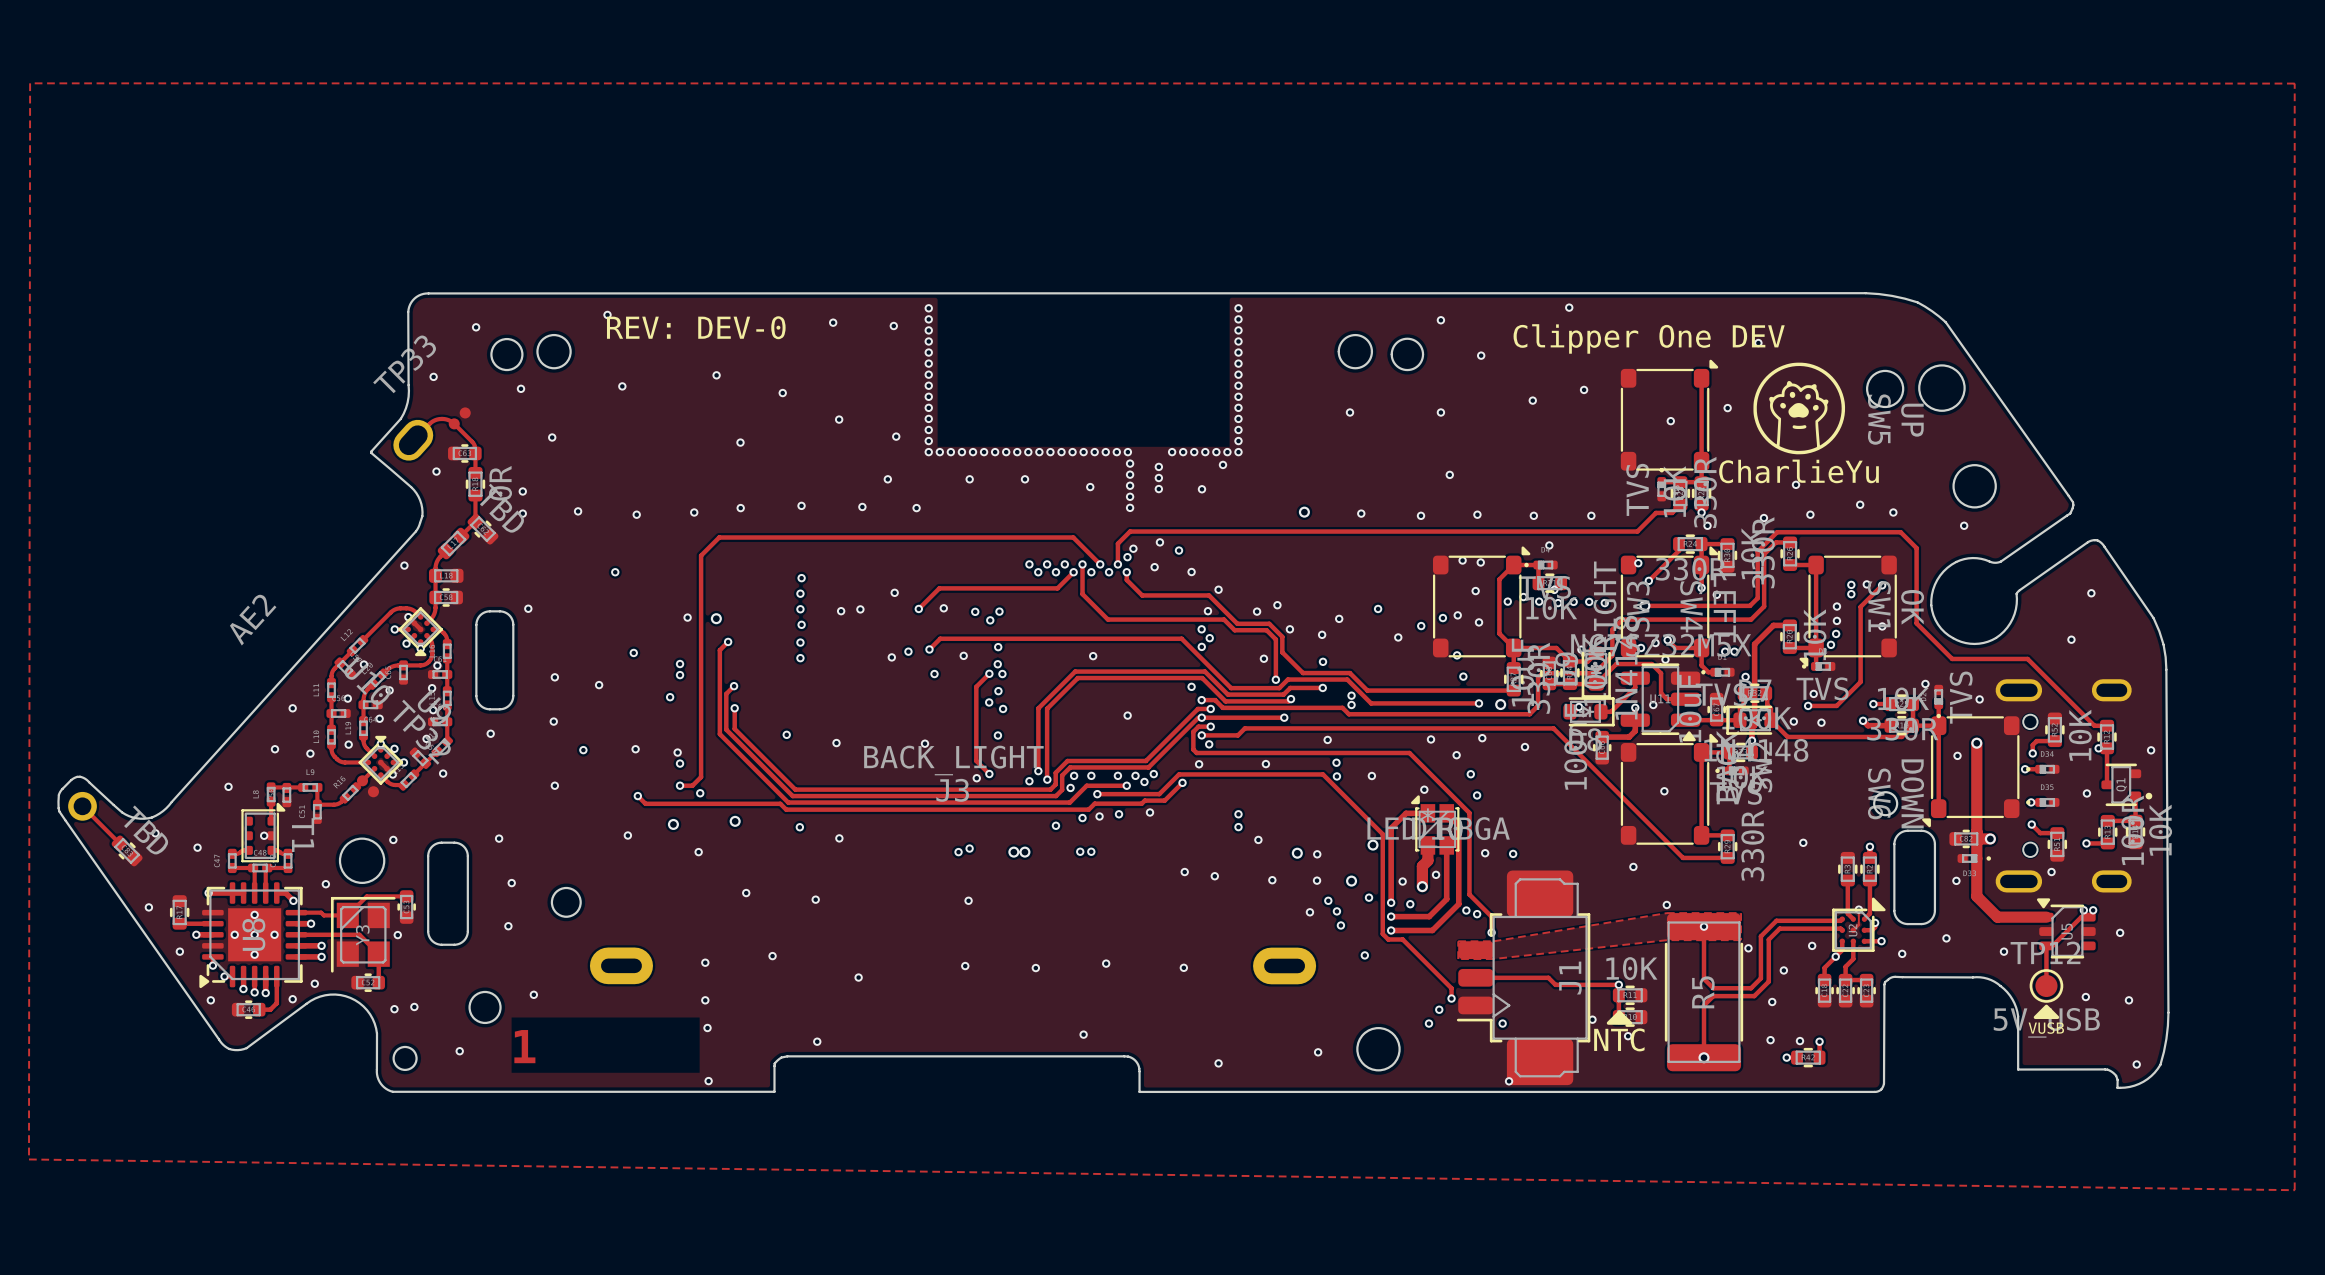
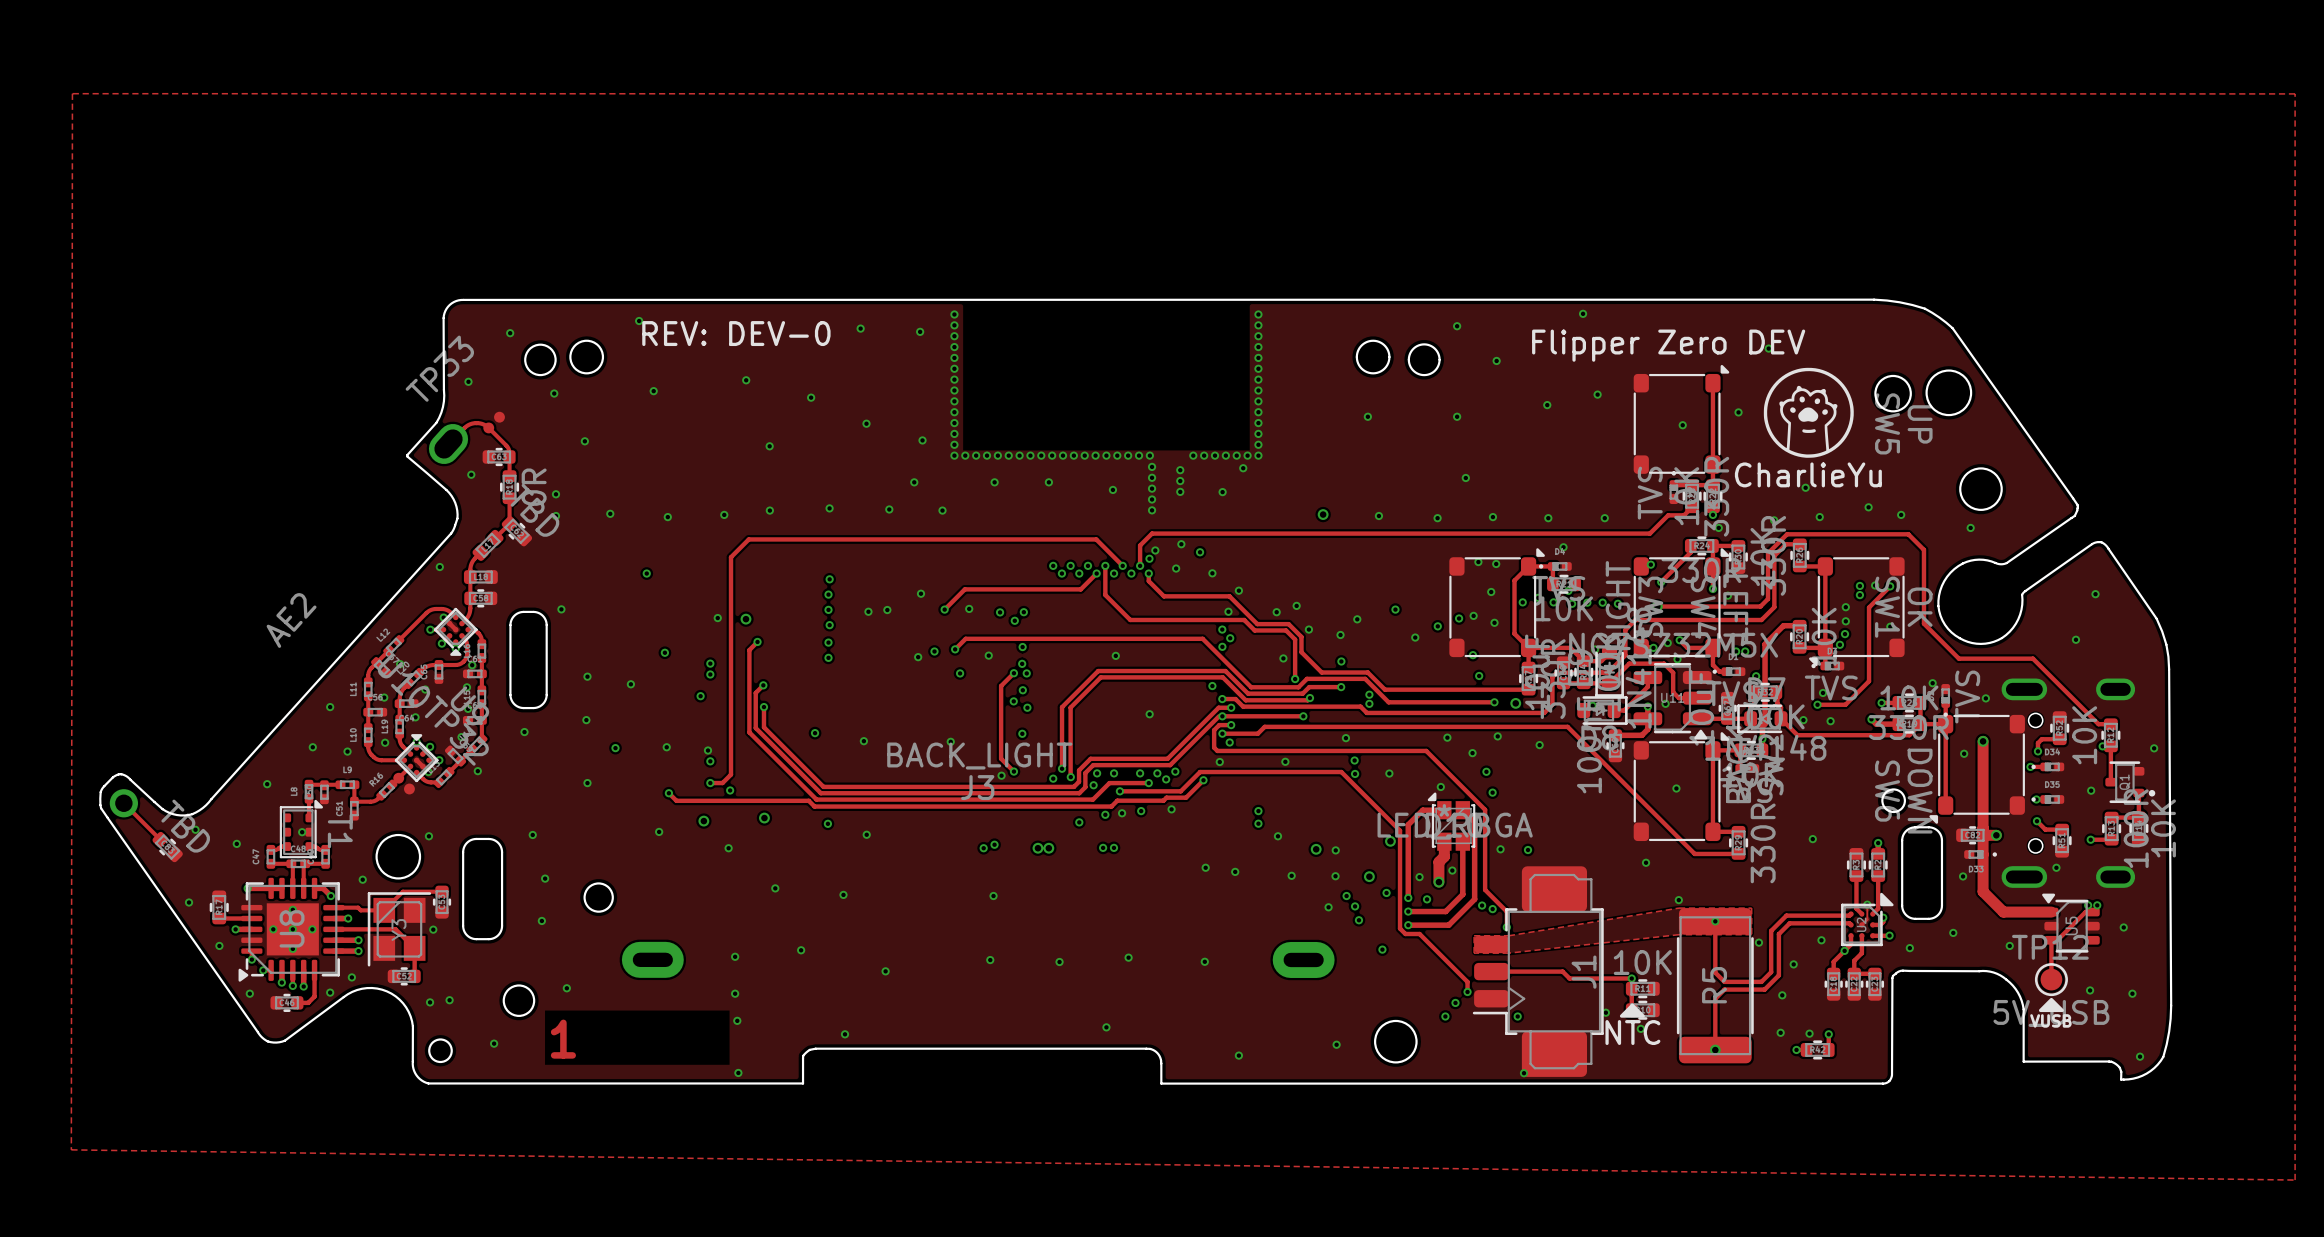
text: Clipper One DEV (1649, 338) -> Flipper Zero DEV (1668, 345)

